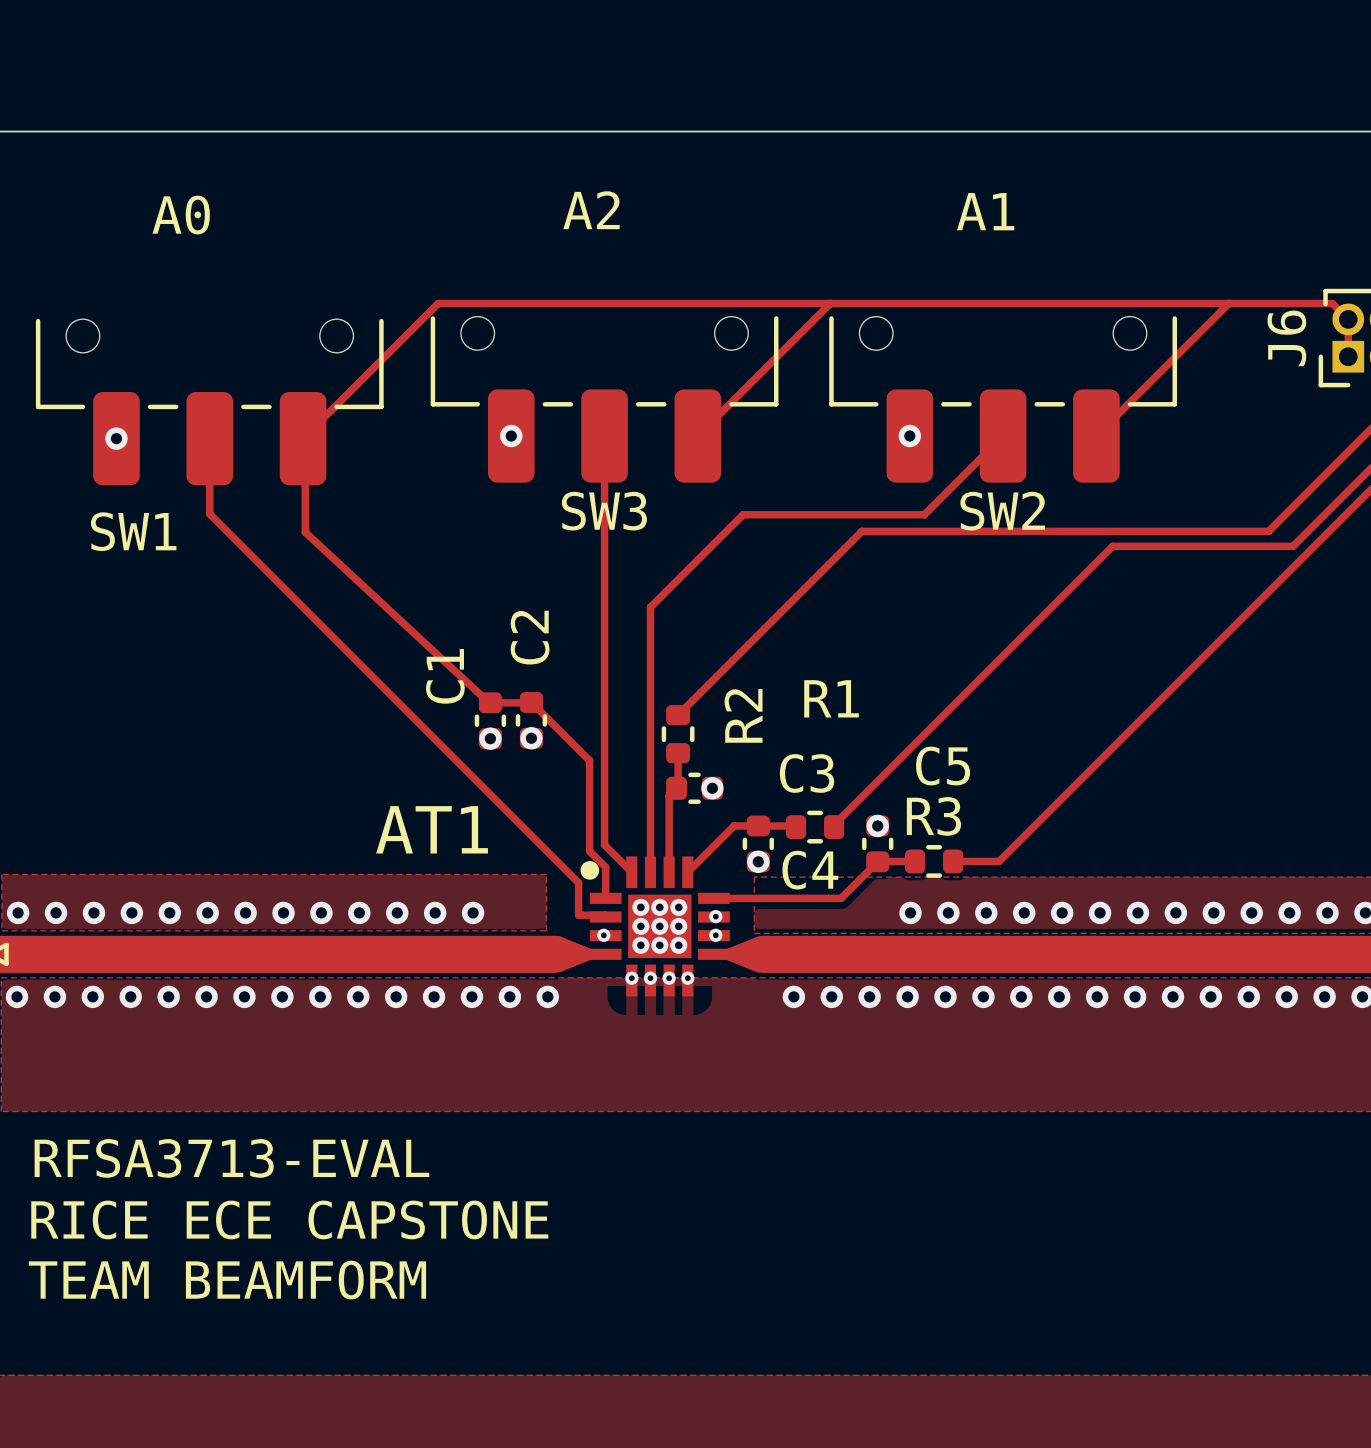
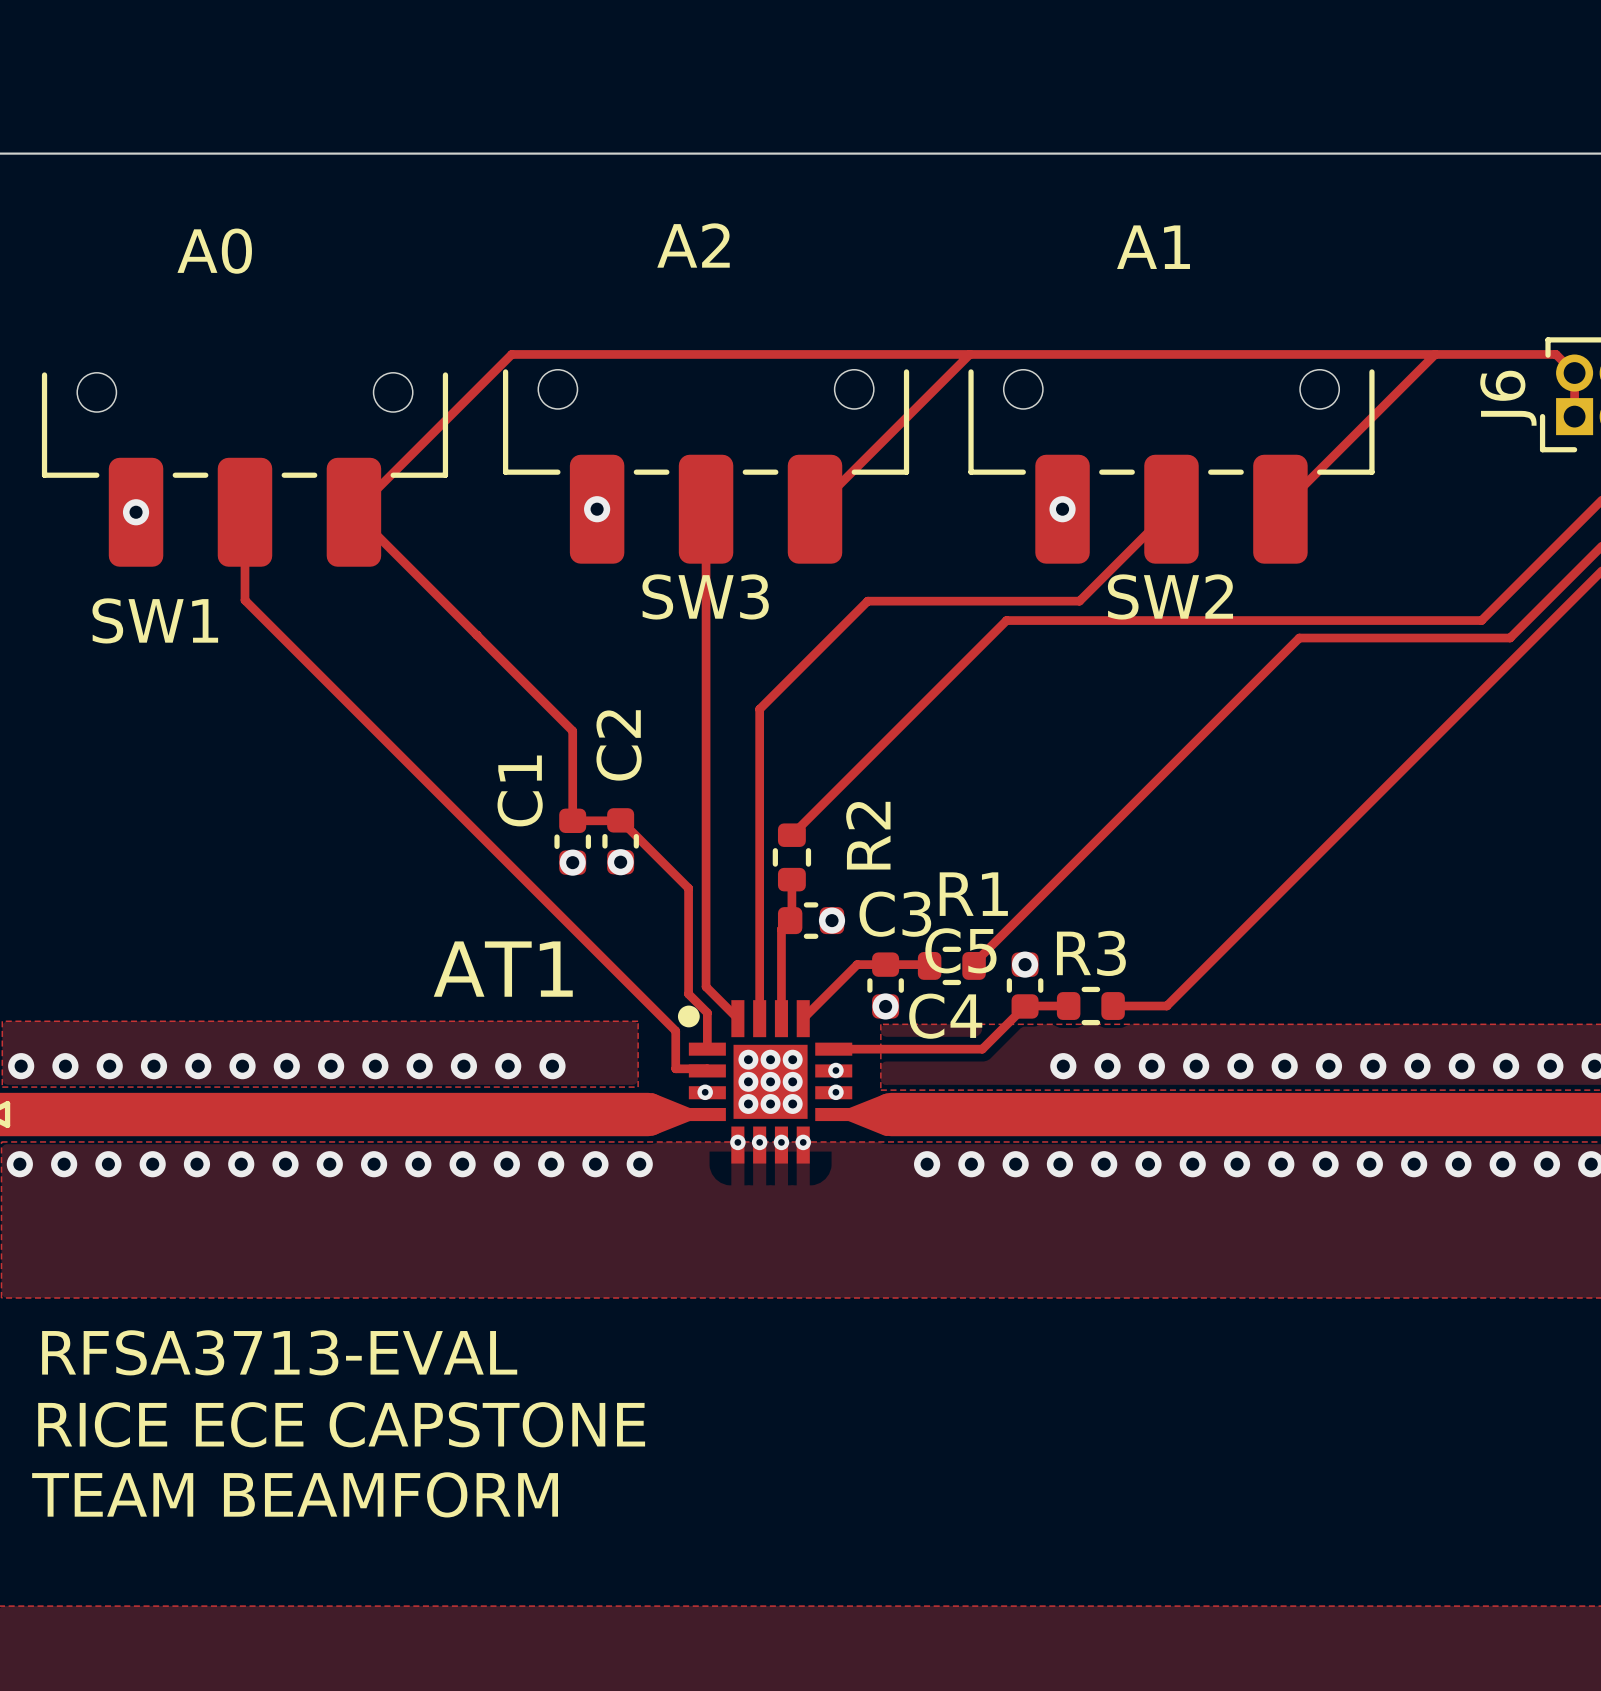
track: (305, 435) (305, 532) (490, 703) -> (353, 512) (572, 731) (572, 820)
R1 name position: R1 (831, 698) -> R1 (973, 894)
C5 name position: C5 (943, 766) -> C5 (960, 950)
C3 name position: C3 (807, 773) -> C3 (895, 914)

